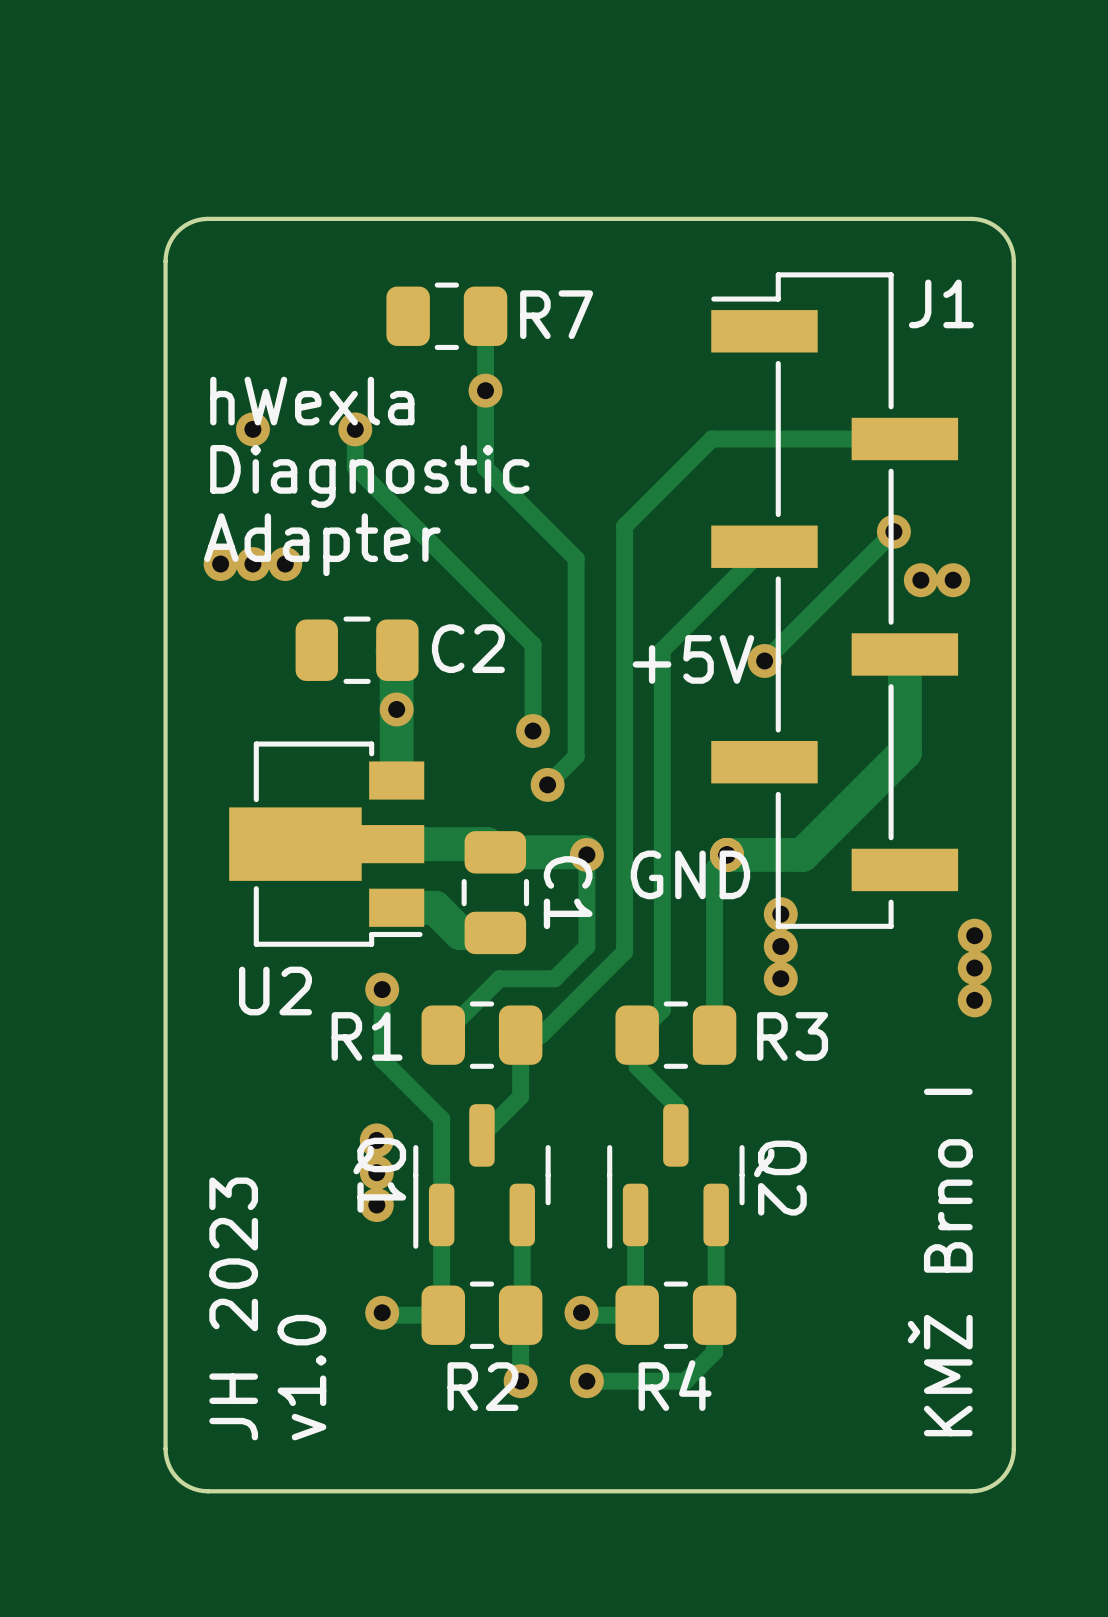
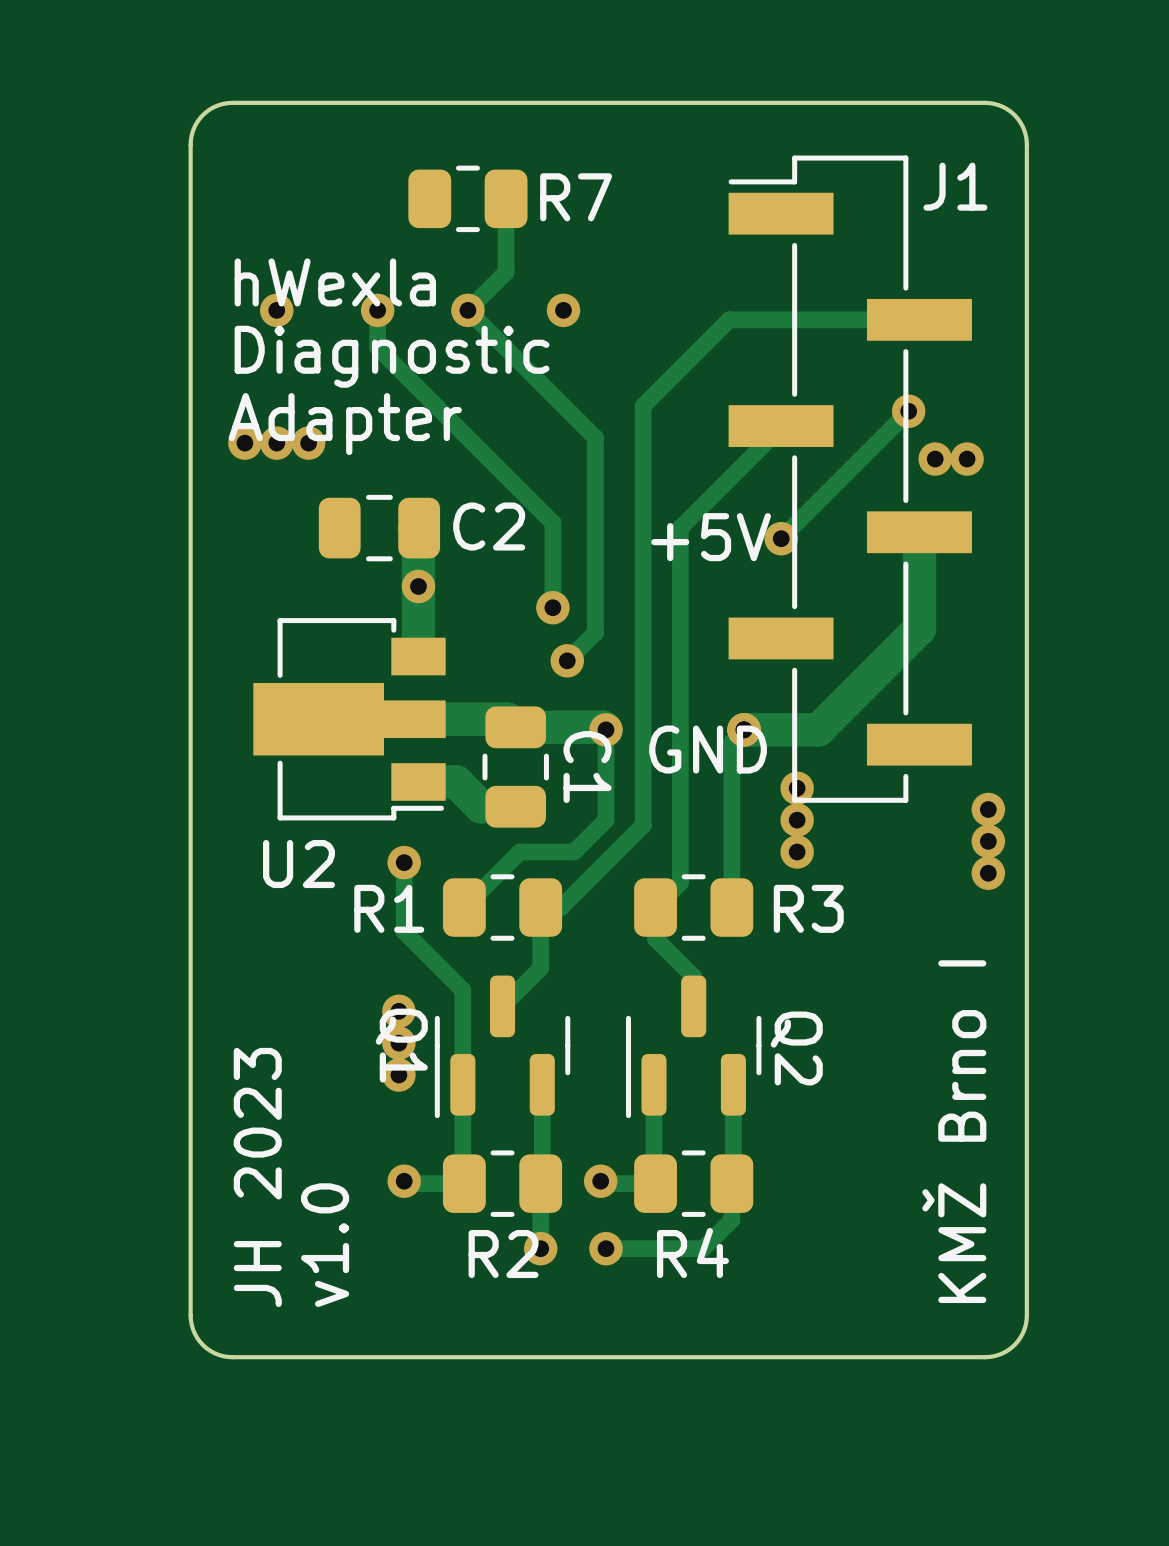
track: (485, 390) (485, 468) -> (506, 272) (467, 310) (506, 348)
via: (485, 390) -> none
via: none -> (467, 310)
via: none -> (563, 310)

